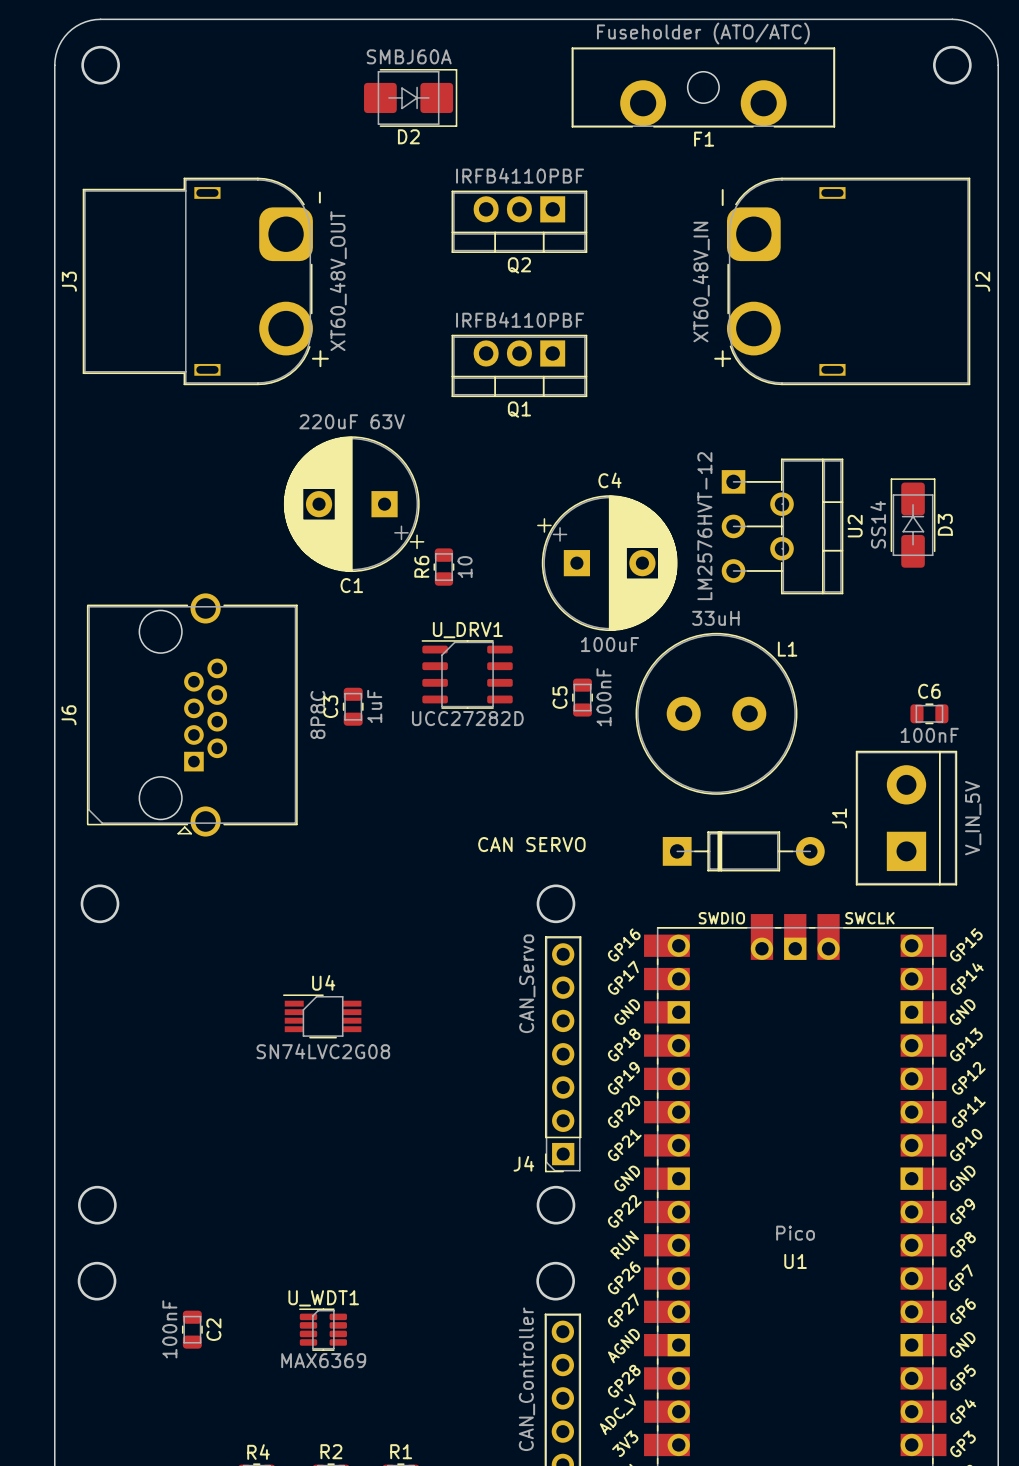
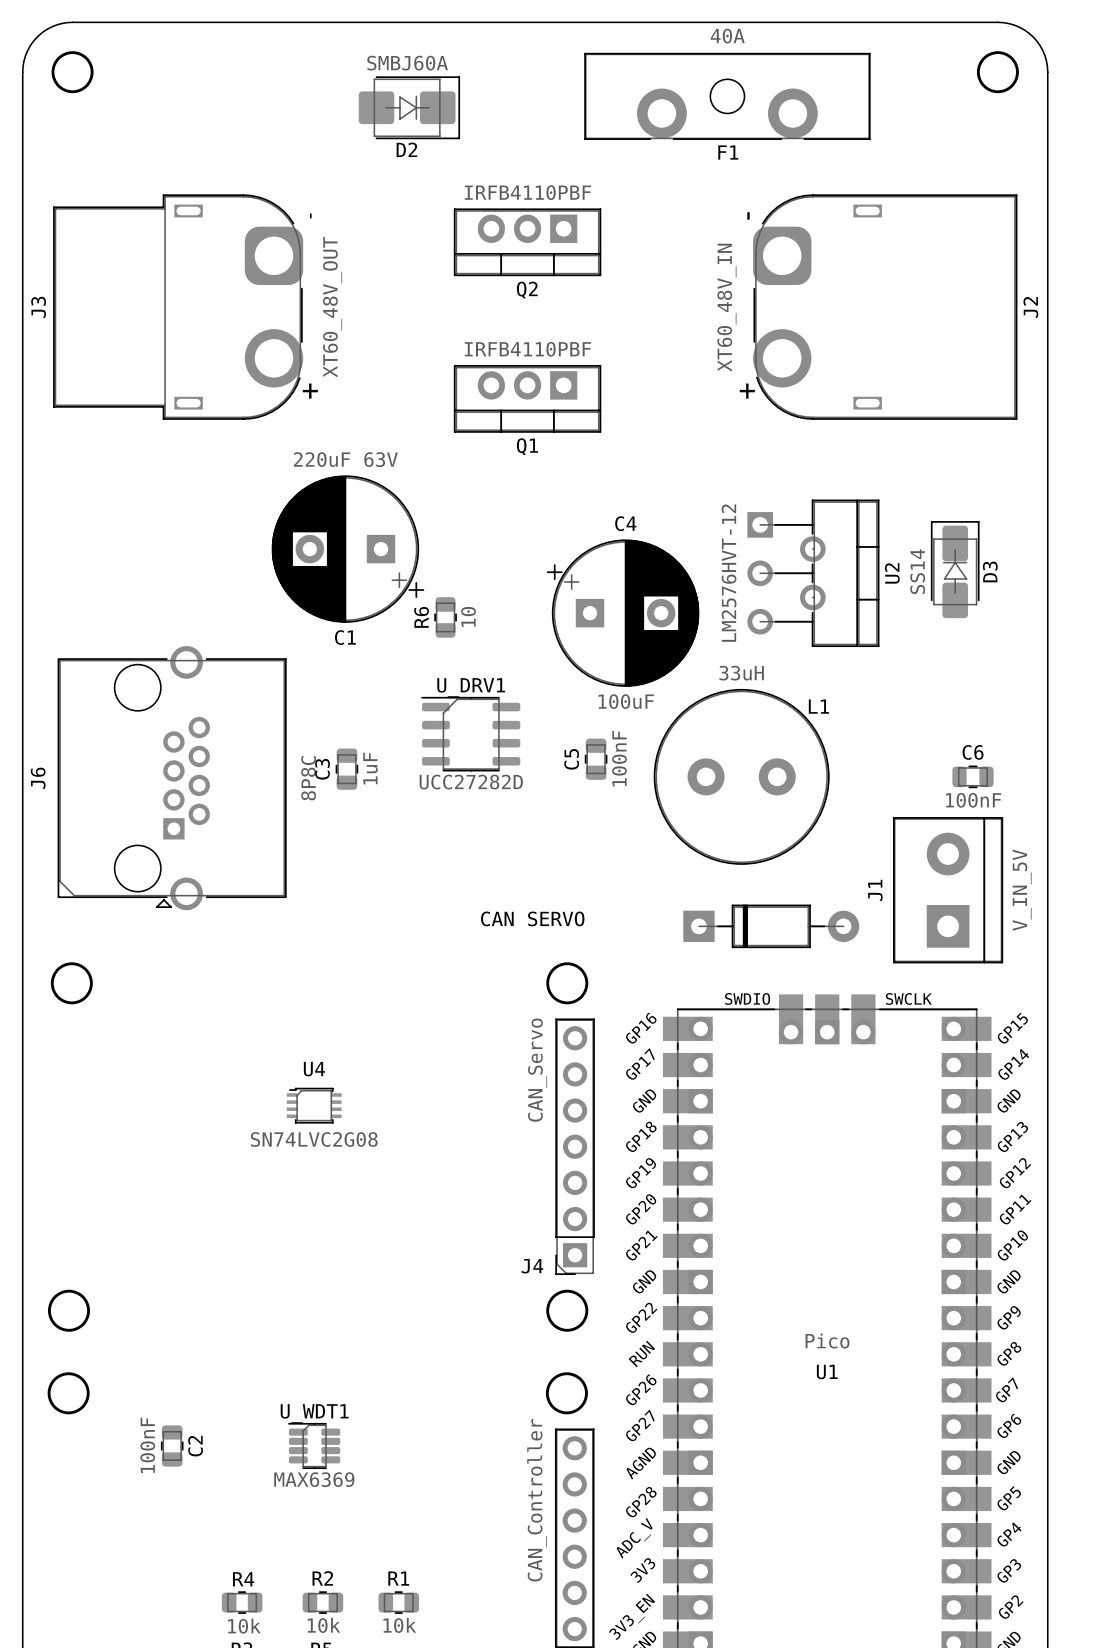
F1 value: Fuseholder (ATO/ATC) (703, 33) -> 40A (727, 36)
U4 footprint: [282, 994, 362, 1039] -> [286, 1087, 342, 1124]

